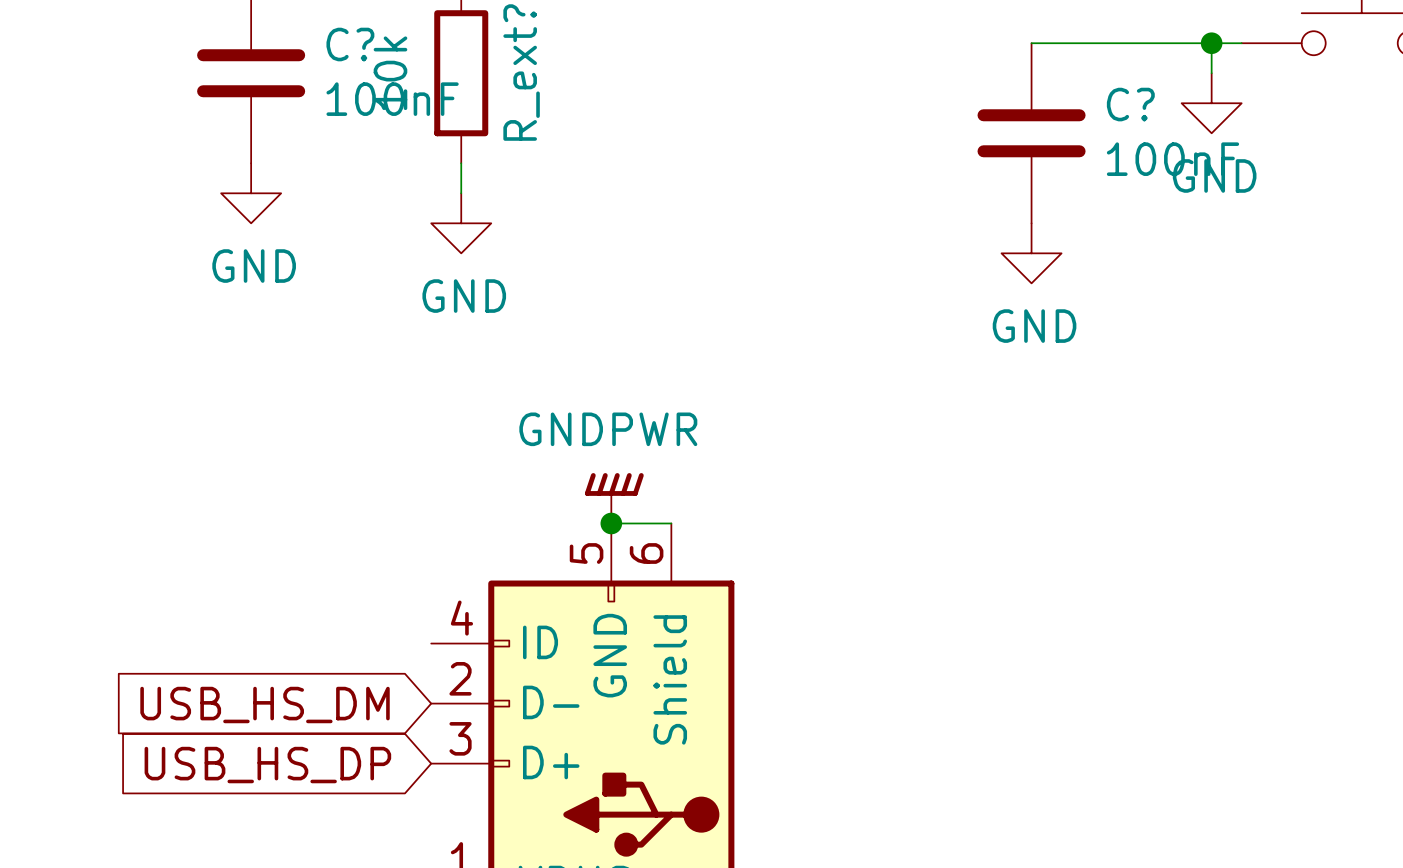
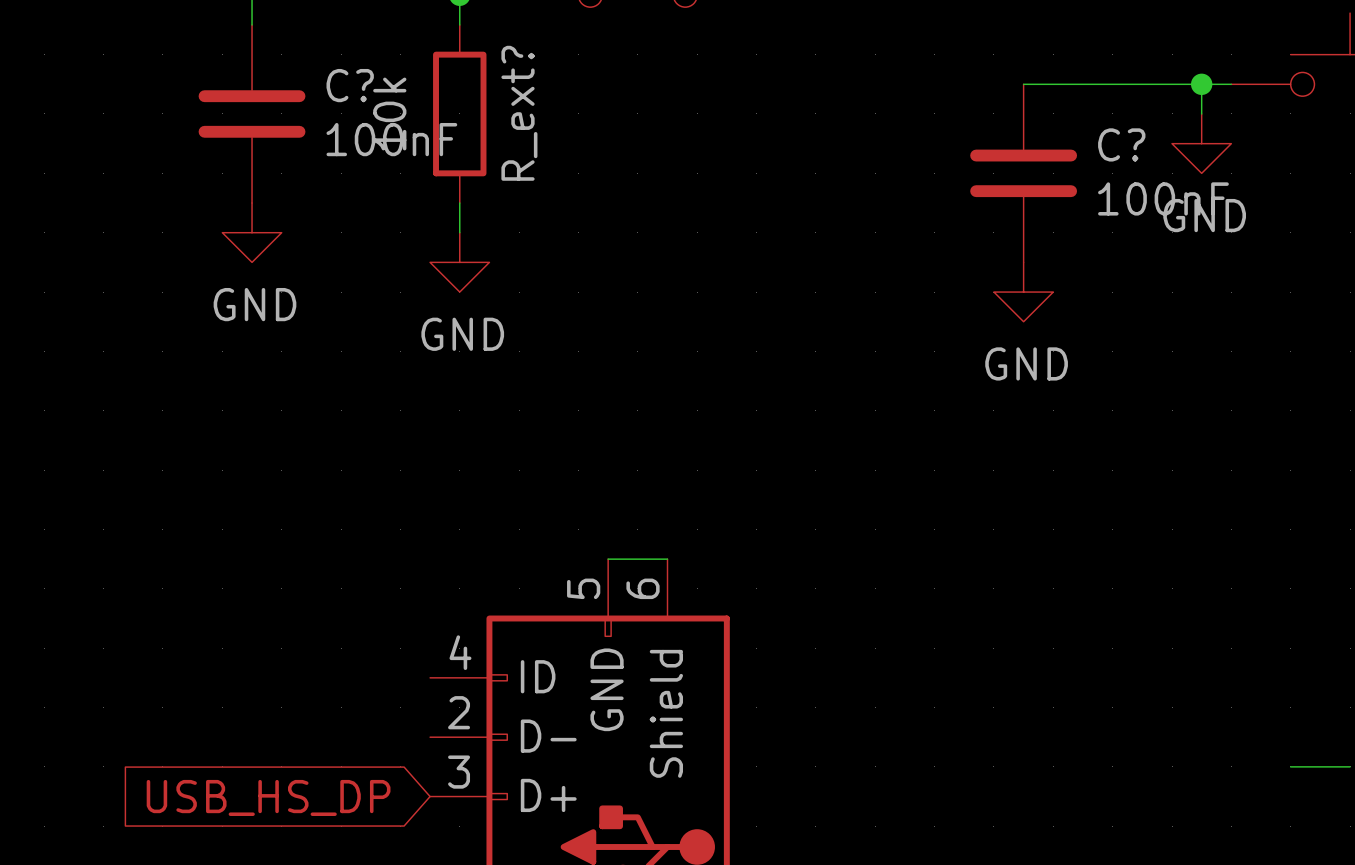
power symbol: GNDPWR (614, 498) -> none
junction: (611, 523) -> none
global label: USB_HS_DM (265, 705) -> none
wire: none -> (1290, 766) (1350, 766)

